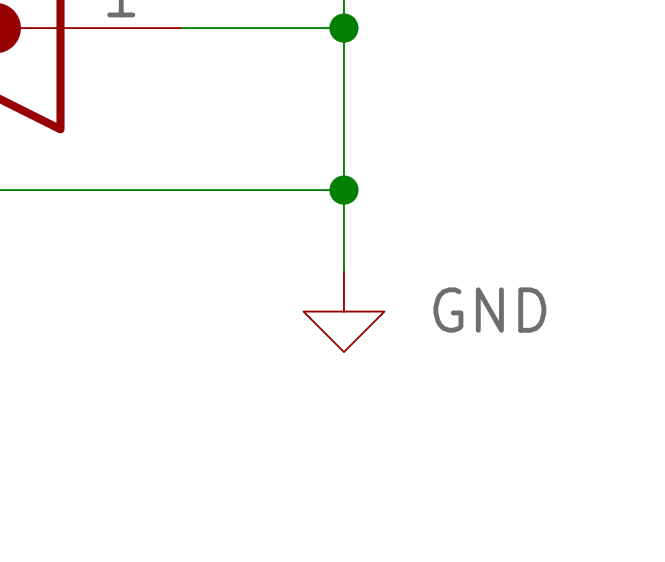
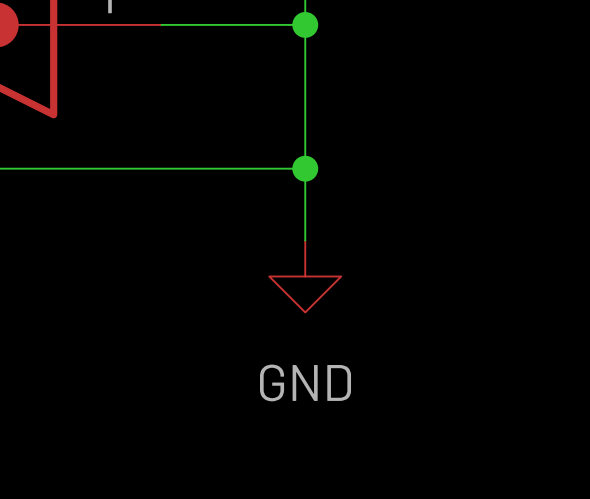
power symbol text position: GND (489, 310) -> GND (305, 382)

